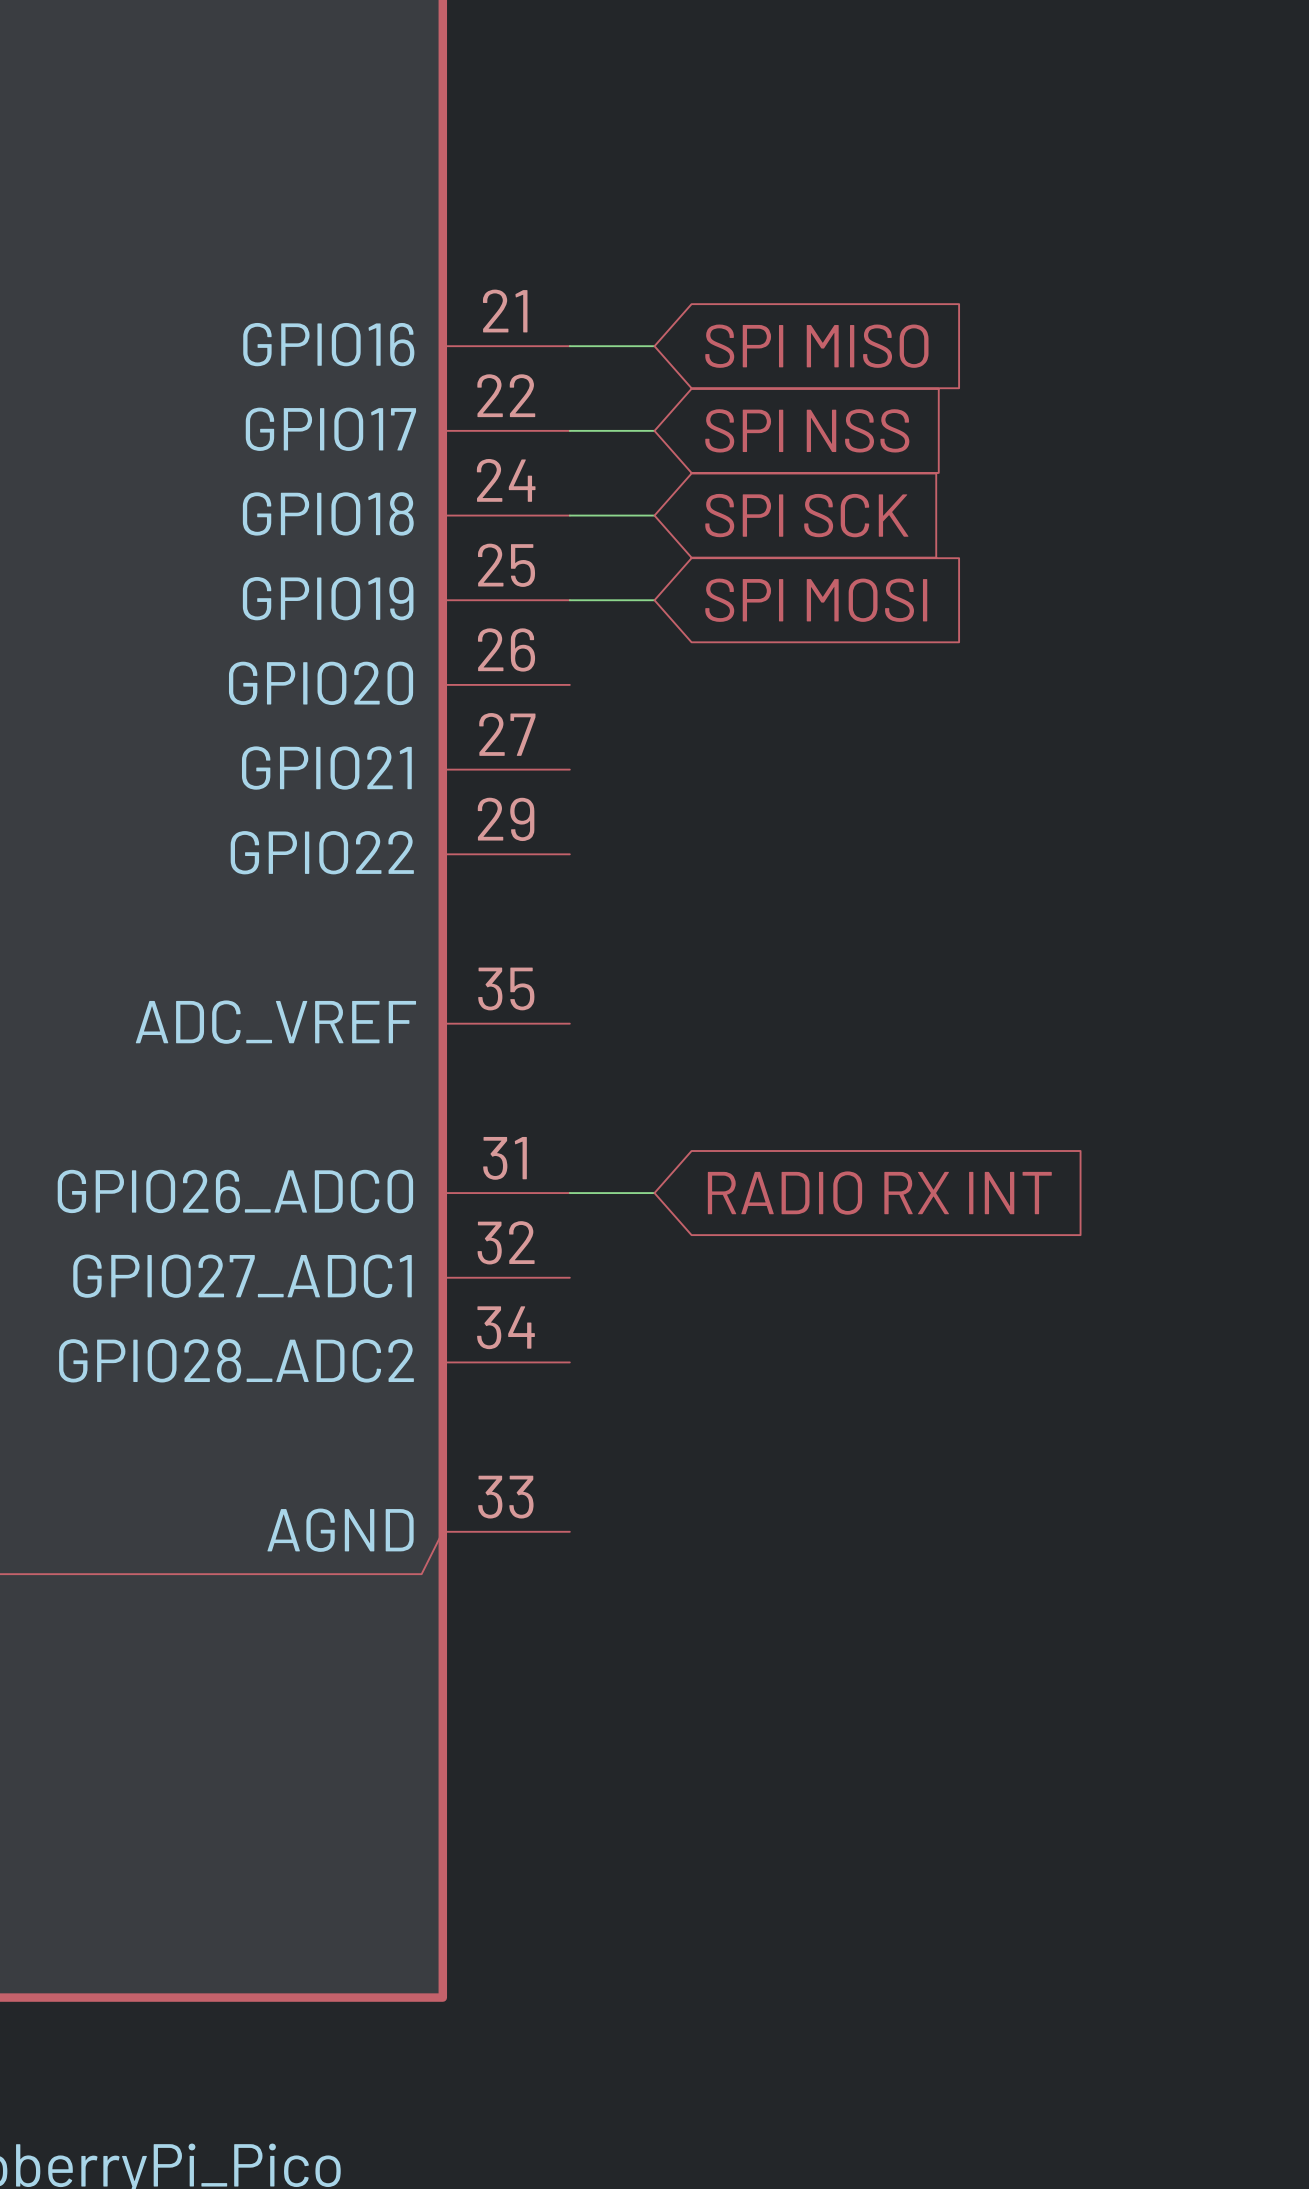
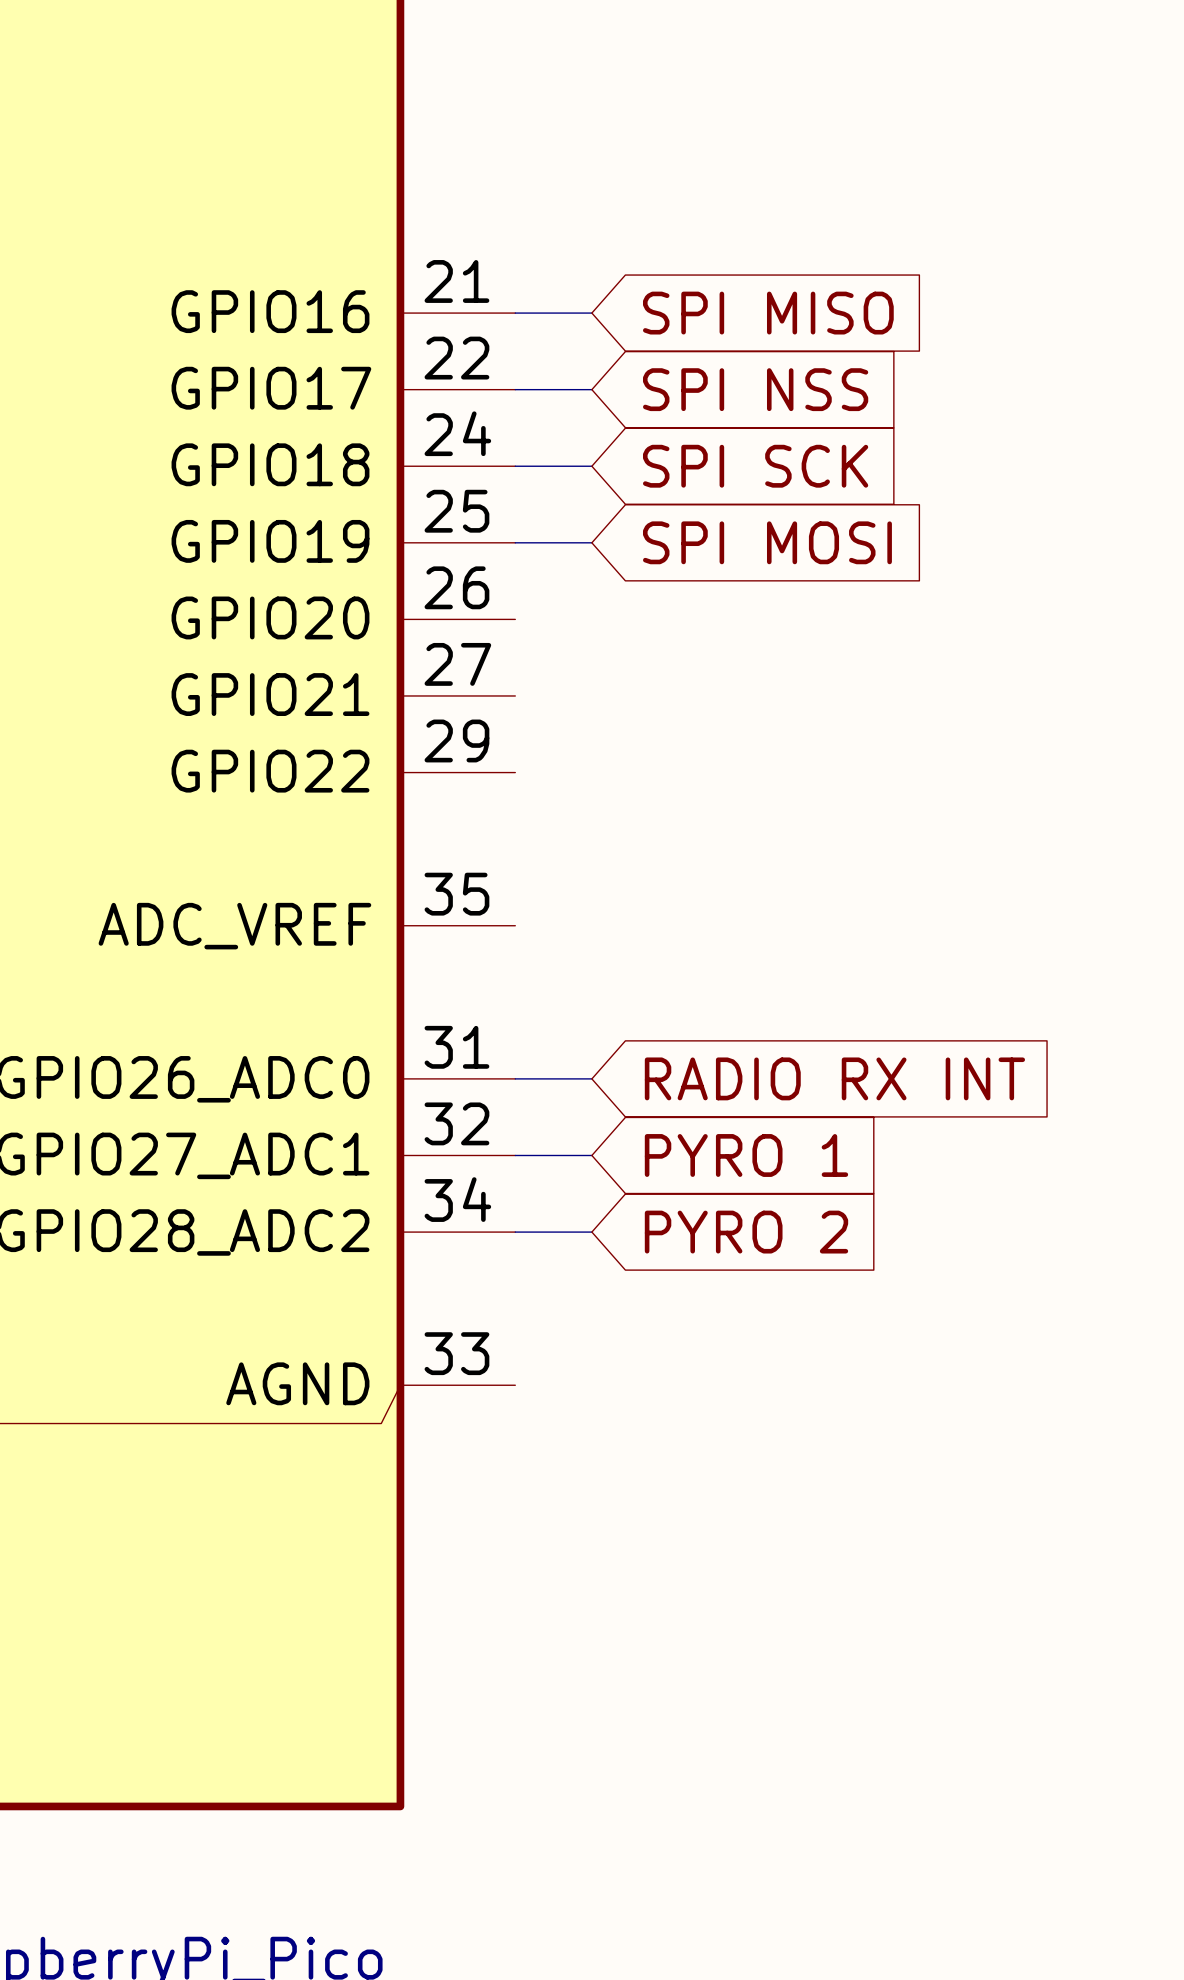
wire: none -> (515, 1155) (591, 1155)
global label: none -> PYRO 1 (746, 1155)
wire: none -> (515, 1232) (591, 1232)
global label: none -> PYRO 2 (746, 1232)

